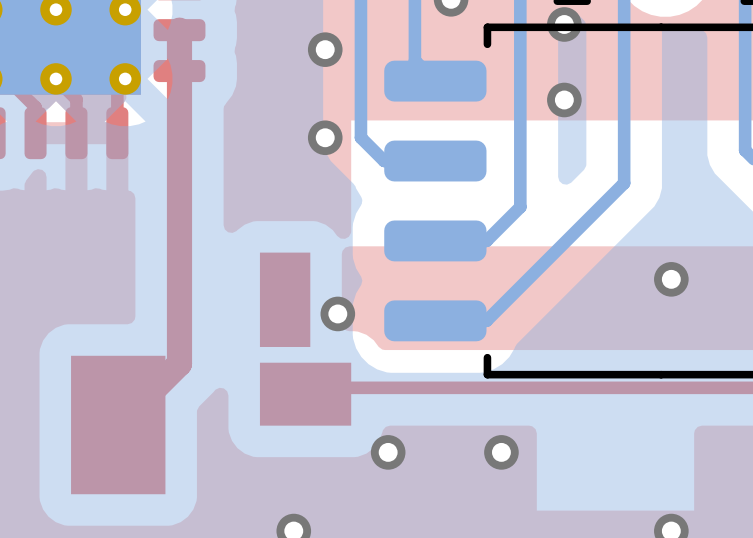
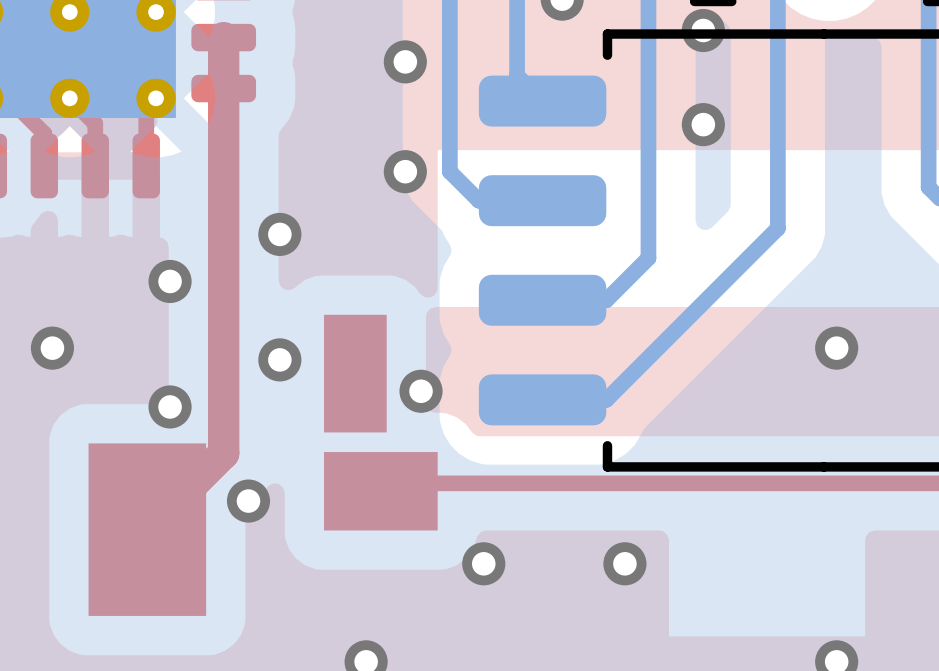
via: none -> (279, 234)
via: none -> (170, 281)
via: none -> (52, 348)
via: none -> (279, 359)
via: none -> (170, 406)
via: none -> (248, 501)

